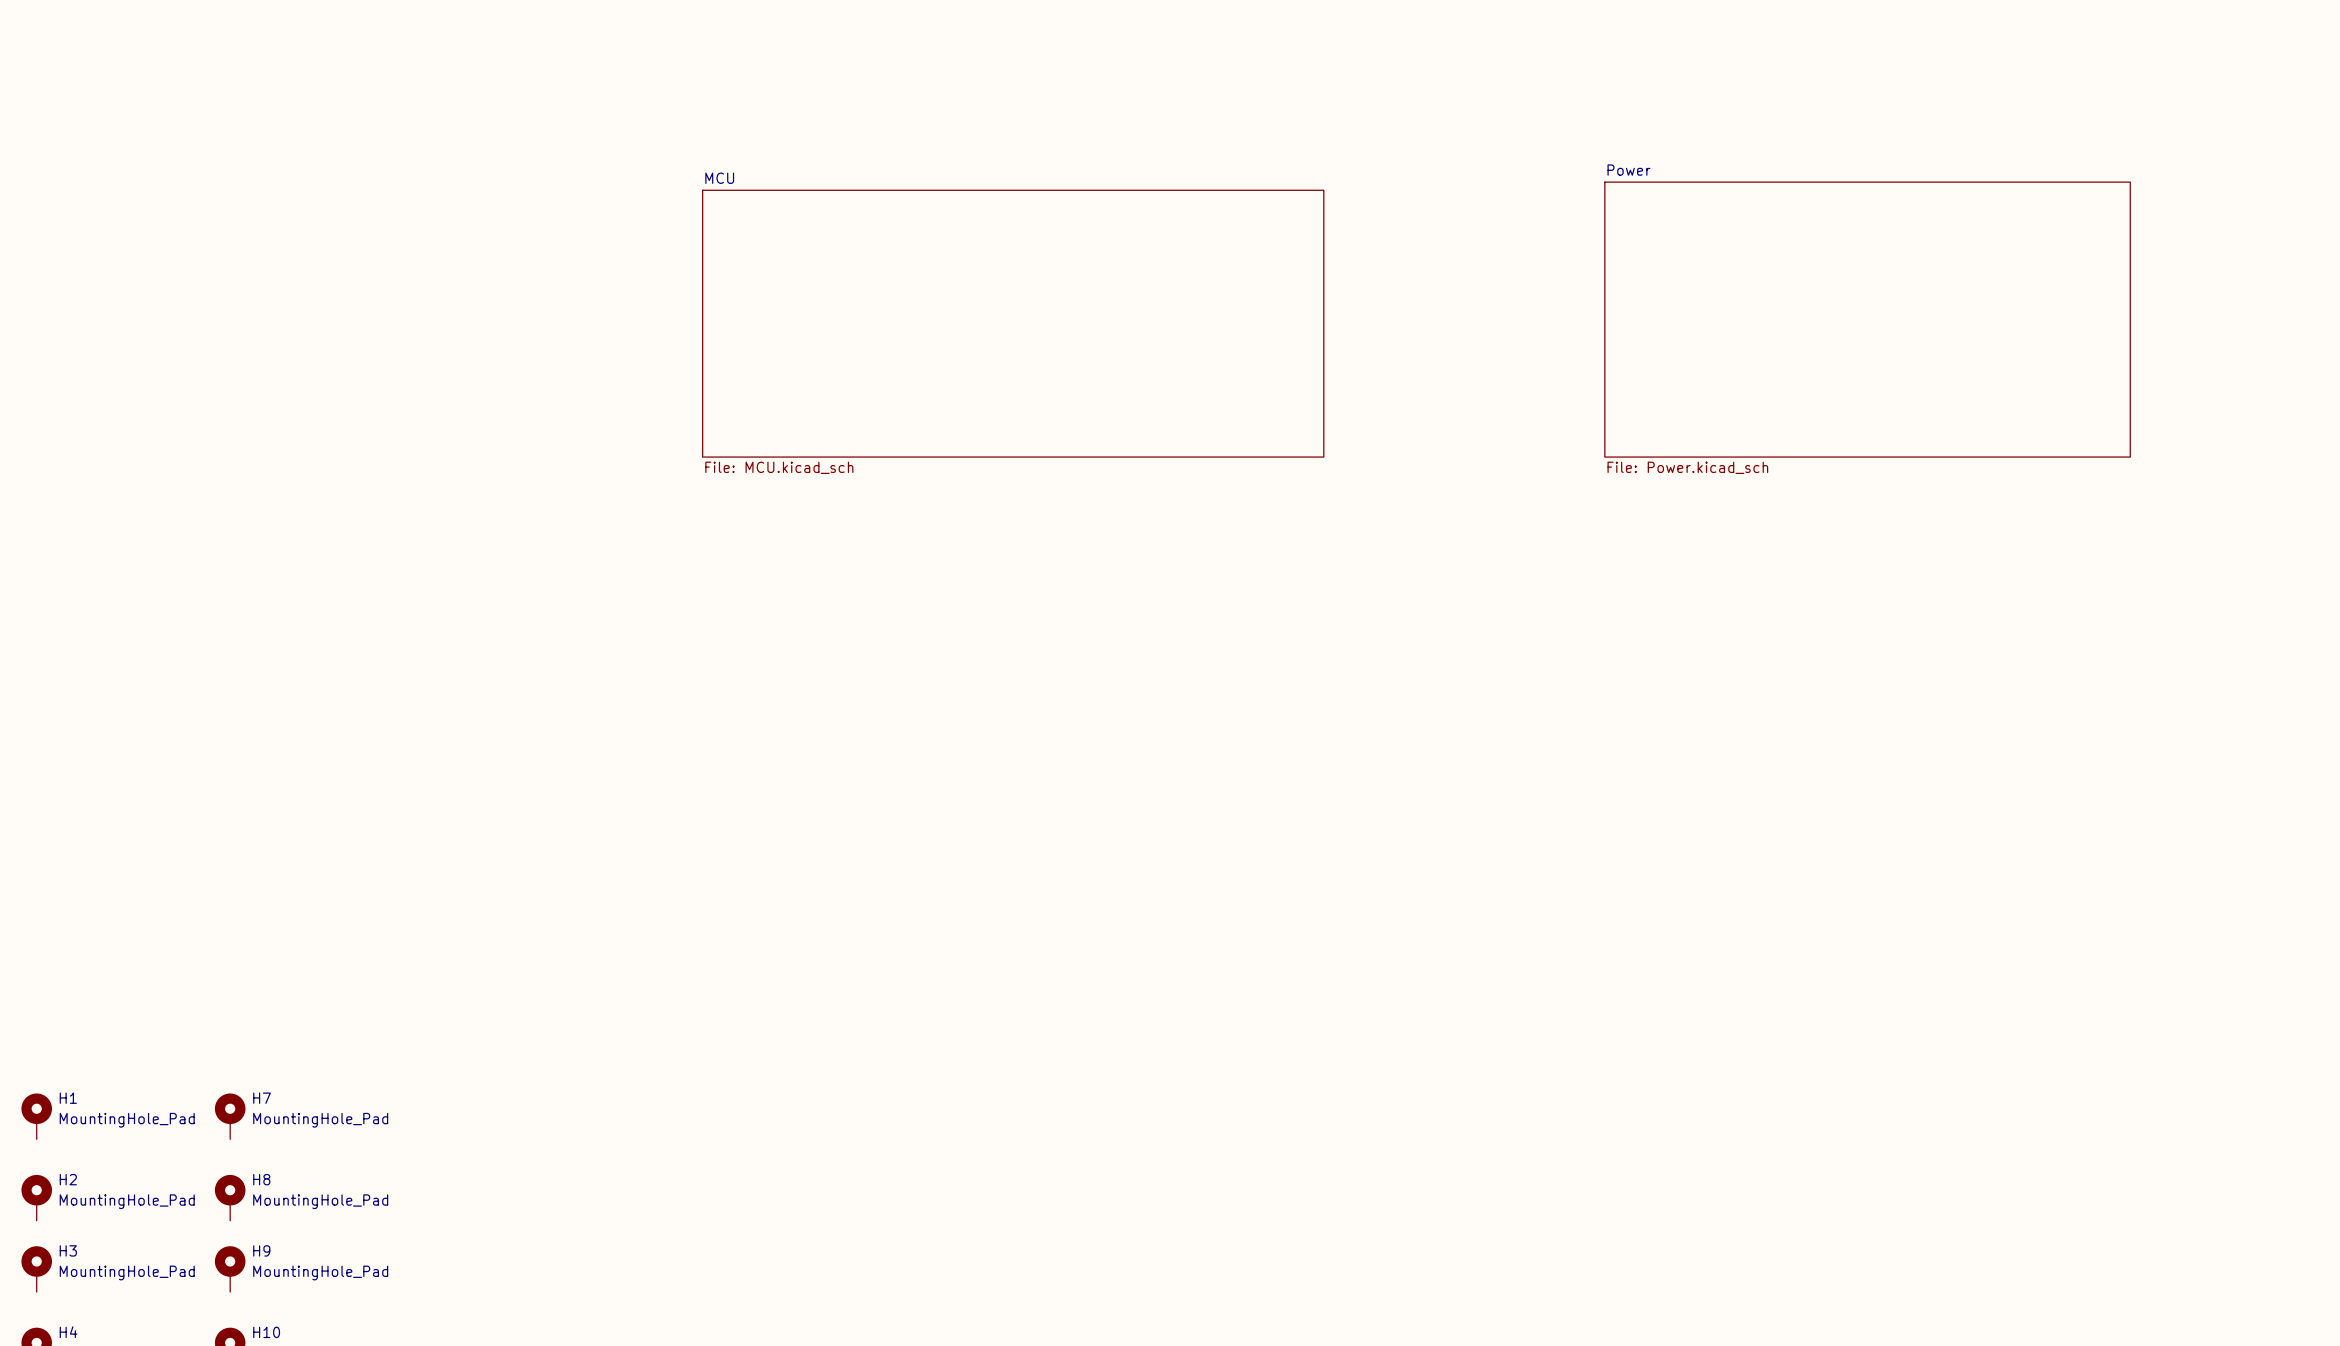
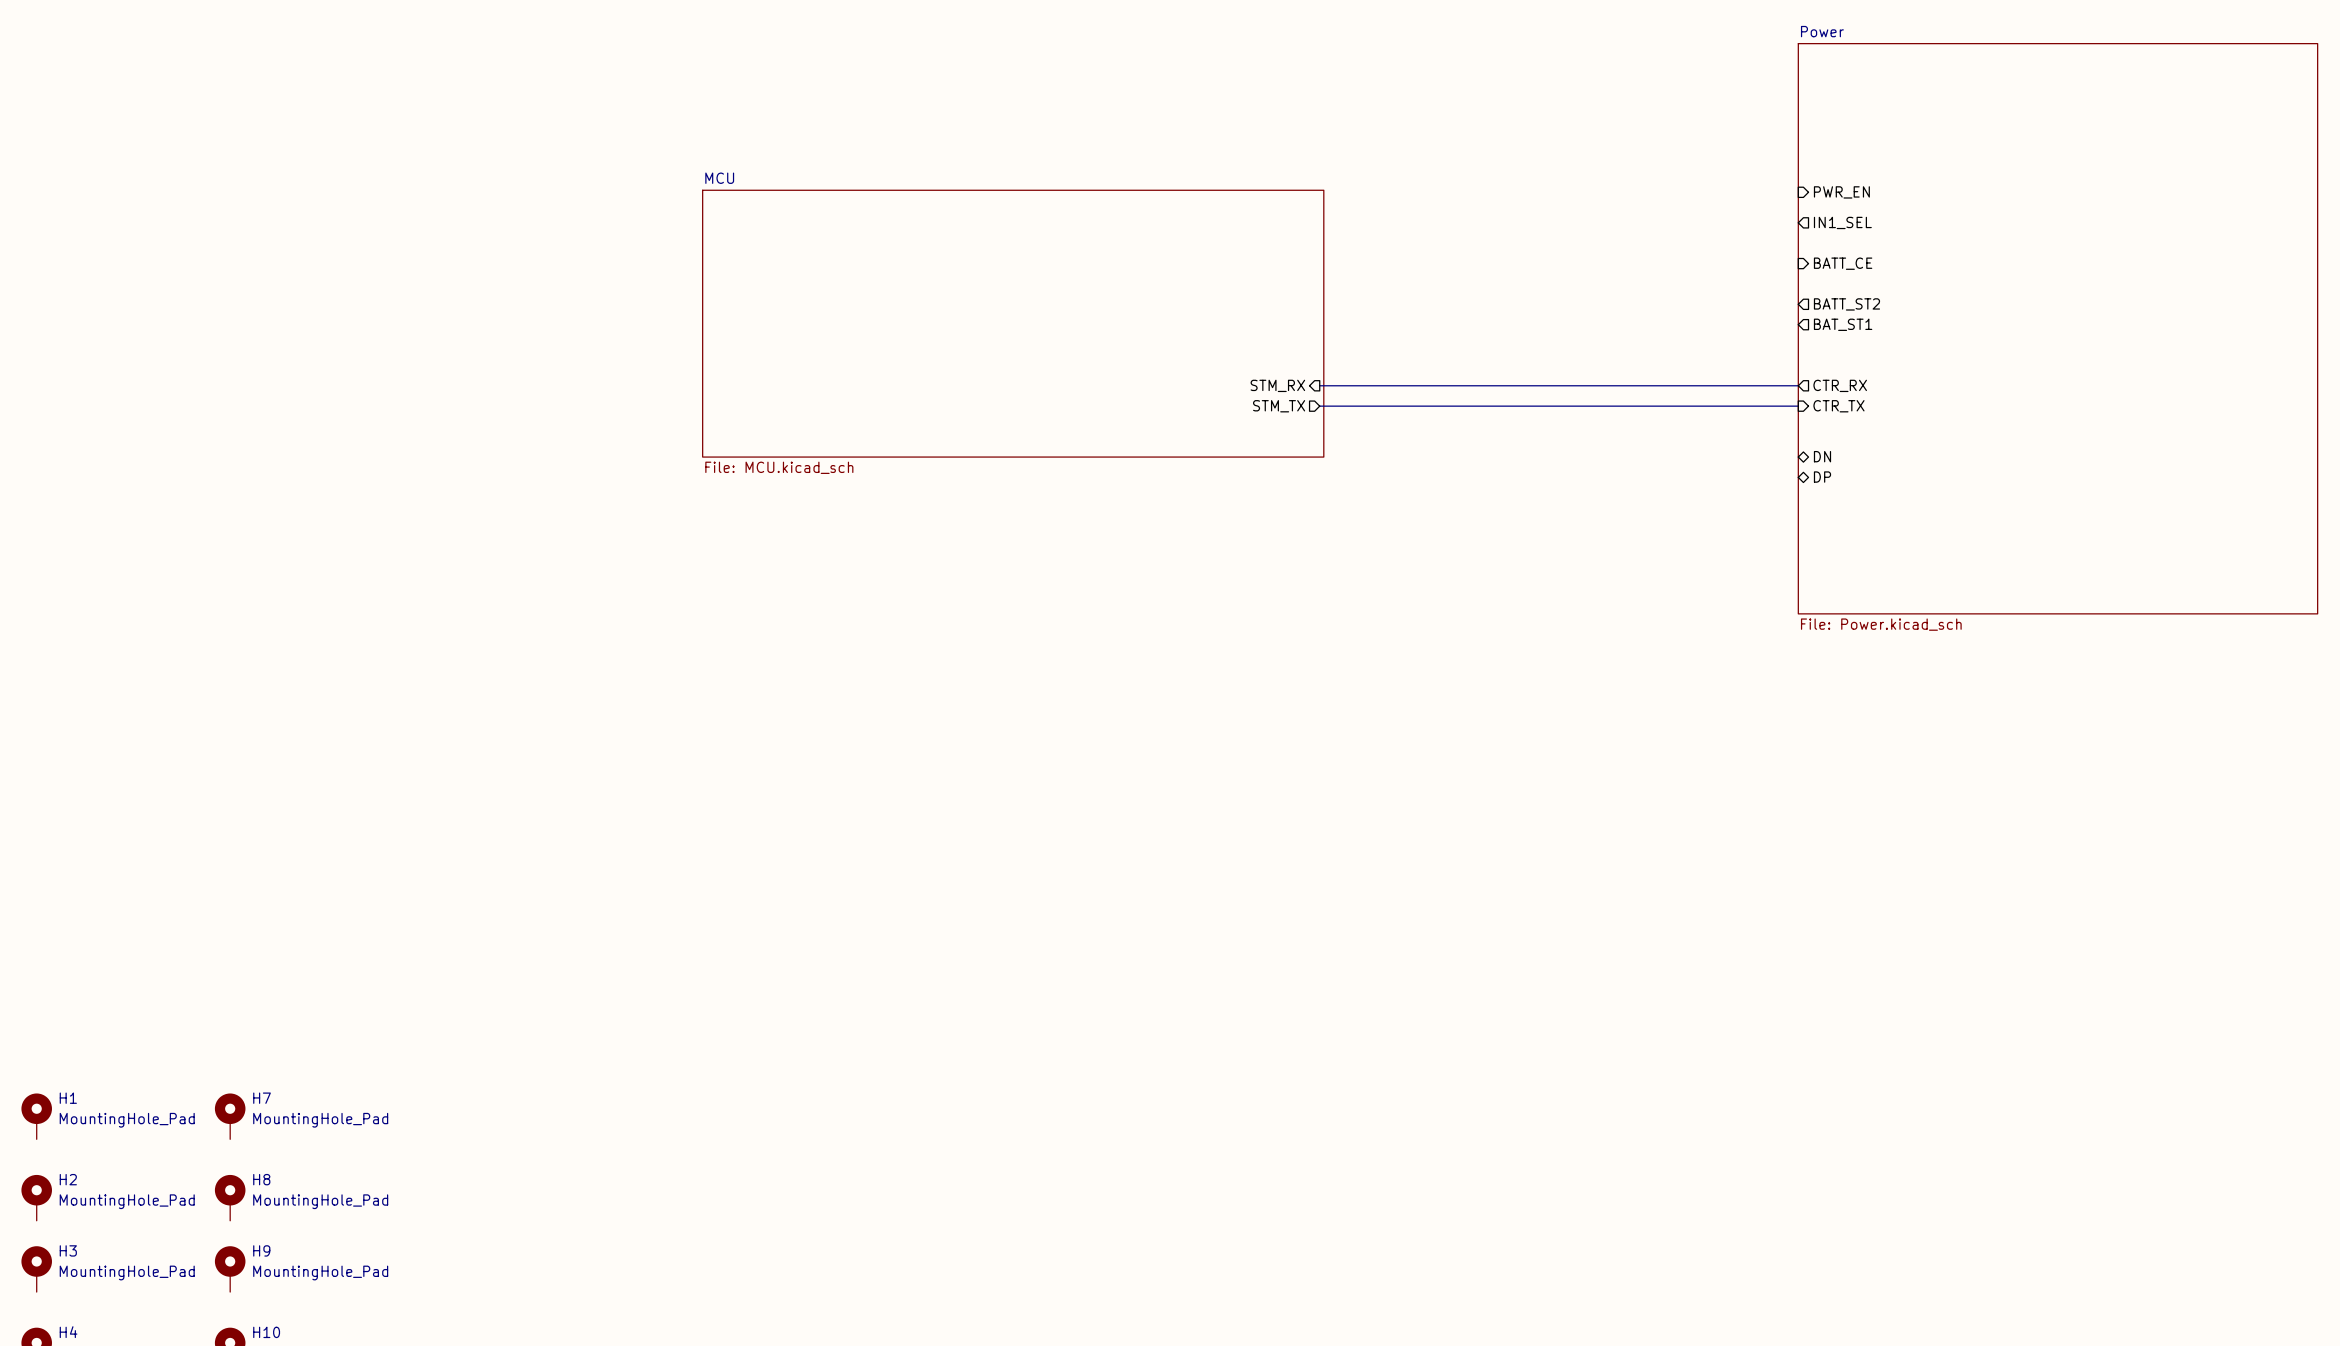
sheet pin: none -> PWR_EN (1841, 192)
sheet pin: none -> IN1_SEL (1842, 222)
sheet pin: none -> BATT_CE (1843, 263)
sheet pin: none -> BATT_ST2 (1846, 304)
sheet Power: File: Power.kicad_sch (1867, 319) -> none
sheet pin: none -> BAT_ST1 (1843, 324)
sheet Power: none -> File: Power.kicad_sch (2057, 328)
sheet pin: none -> STM_RX (1277, 385)
wire: none -> (1319, 385) (1798, 385)
sheet pin: none -> CTR_RX (1840, 385)
sheet pin: none -> STM_TX (1279, 406)
wire: none -> (1319, 406) (1798, 406)
sheet pin: none -> CTR_TX (1838, 406)
sheet pin: none -> DN (1822, 456)
sheet pin: none -> DP (1822, 477)

